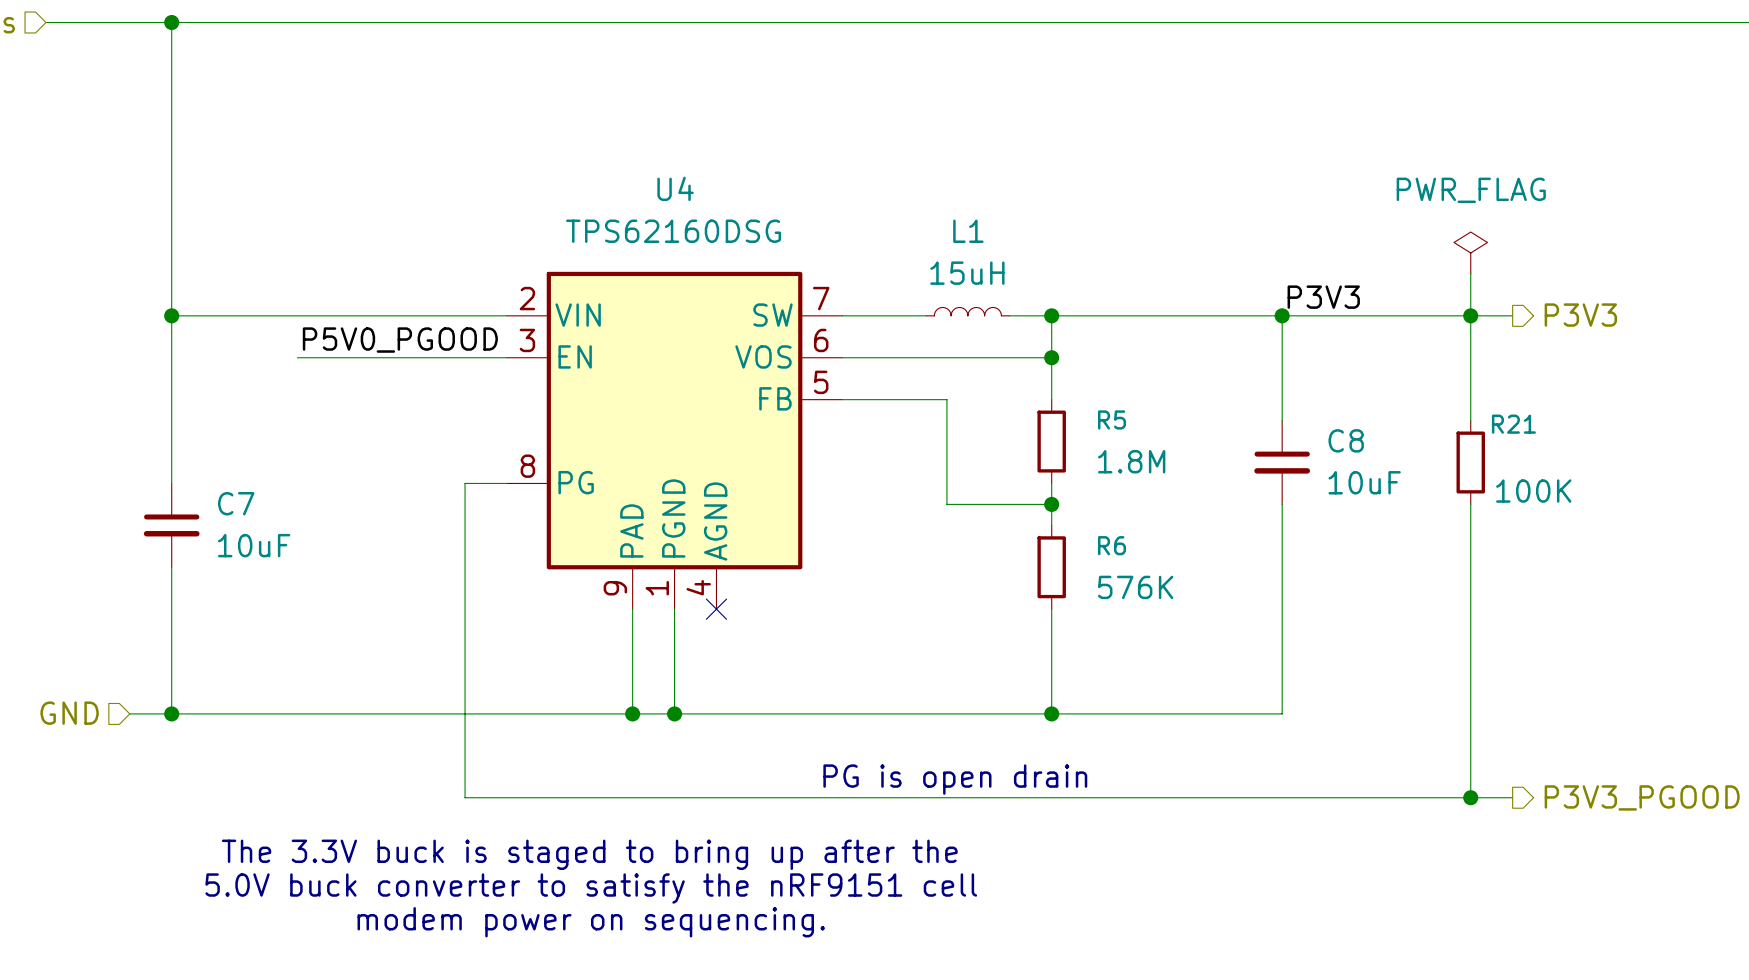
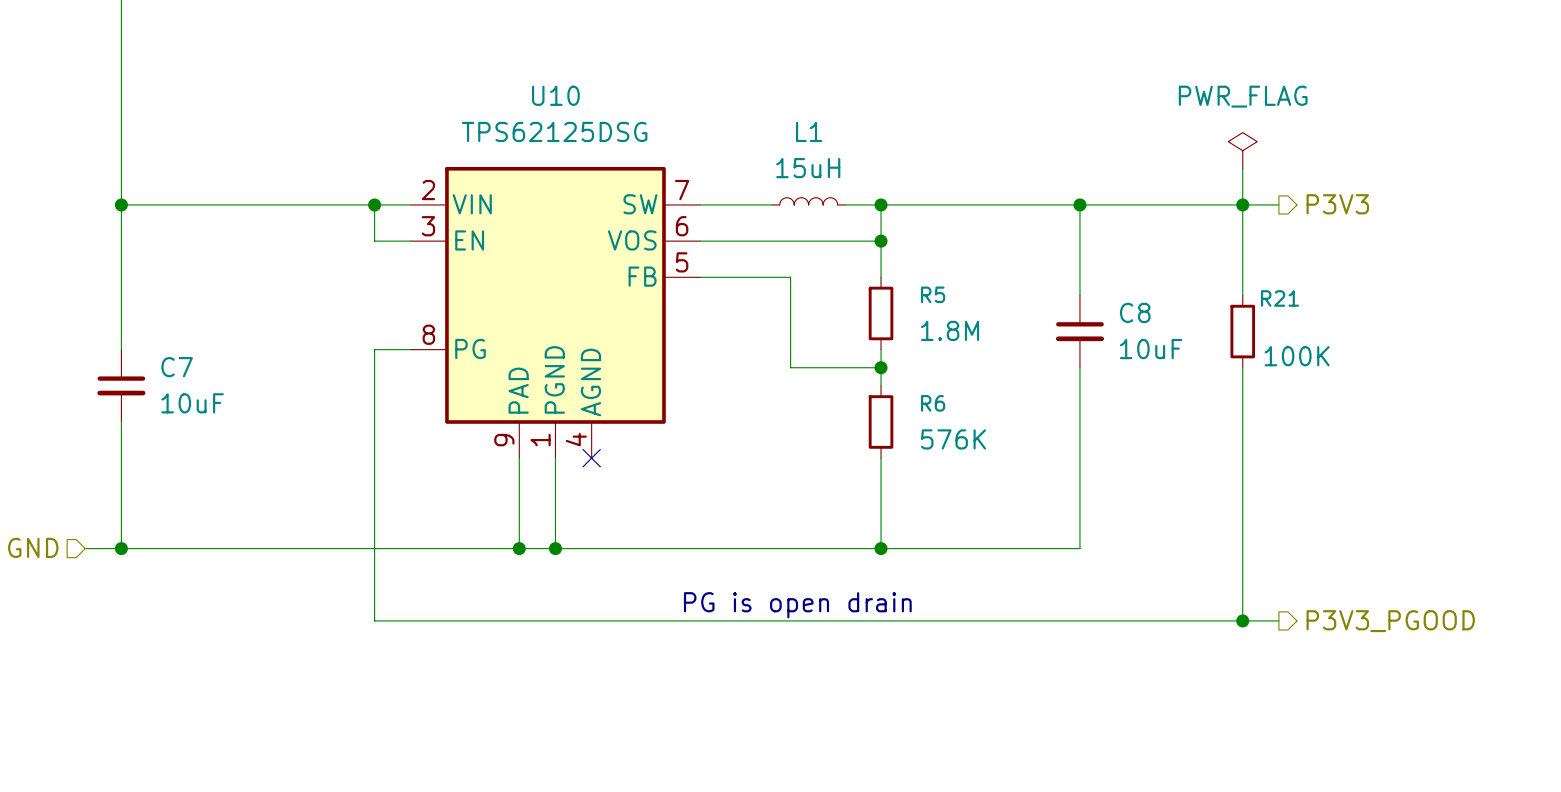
U4 name: U4 (675, 188) -> U10 (555, 95)
U4 value: TPS62160DSG (673, 231) -> TPS62125DSG (554, 131)
label: P3V3 (1323, 297) -> none
junction: none -> (374, 204)
label: P5V0_PGOOD (400, 340) -> none
wire: (297, 357) (465, 357) -> (374, 204) (374, 241)
text: The 3.3V buck is staged to bring up after the (589, 854) -> none
text: 5.0V buck converter to satisfy the nRF9151 cell (591, 888) -> none
text: modem power on sequencing. (591, 922) -> none

